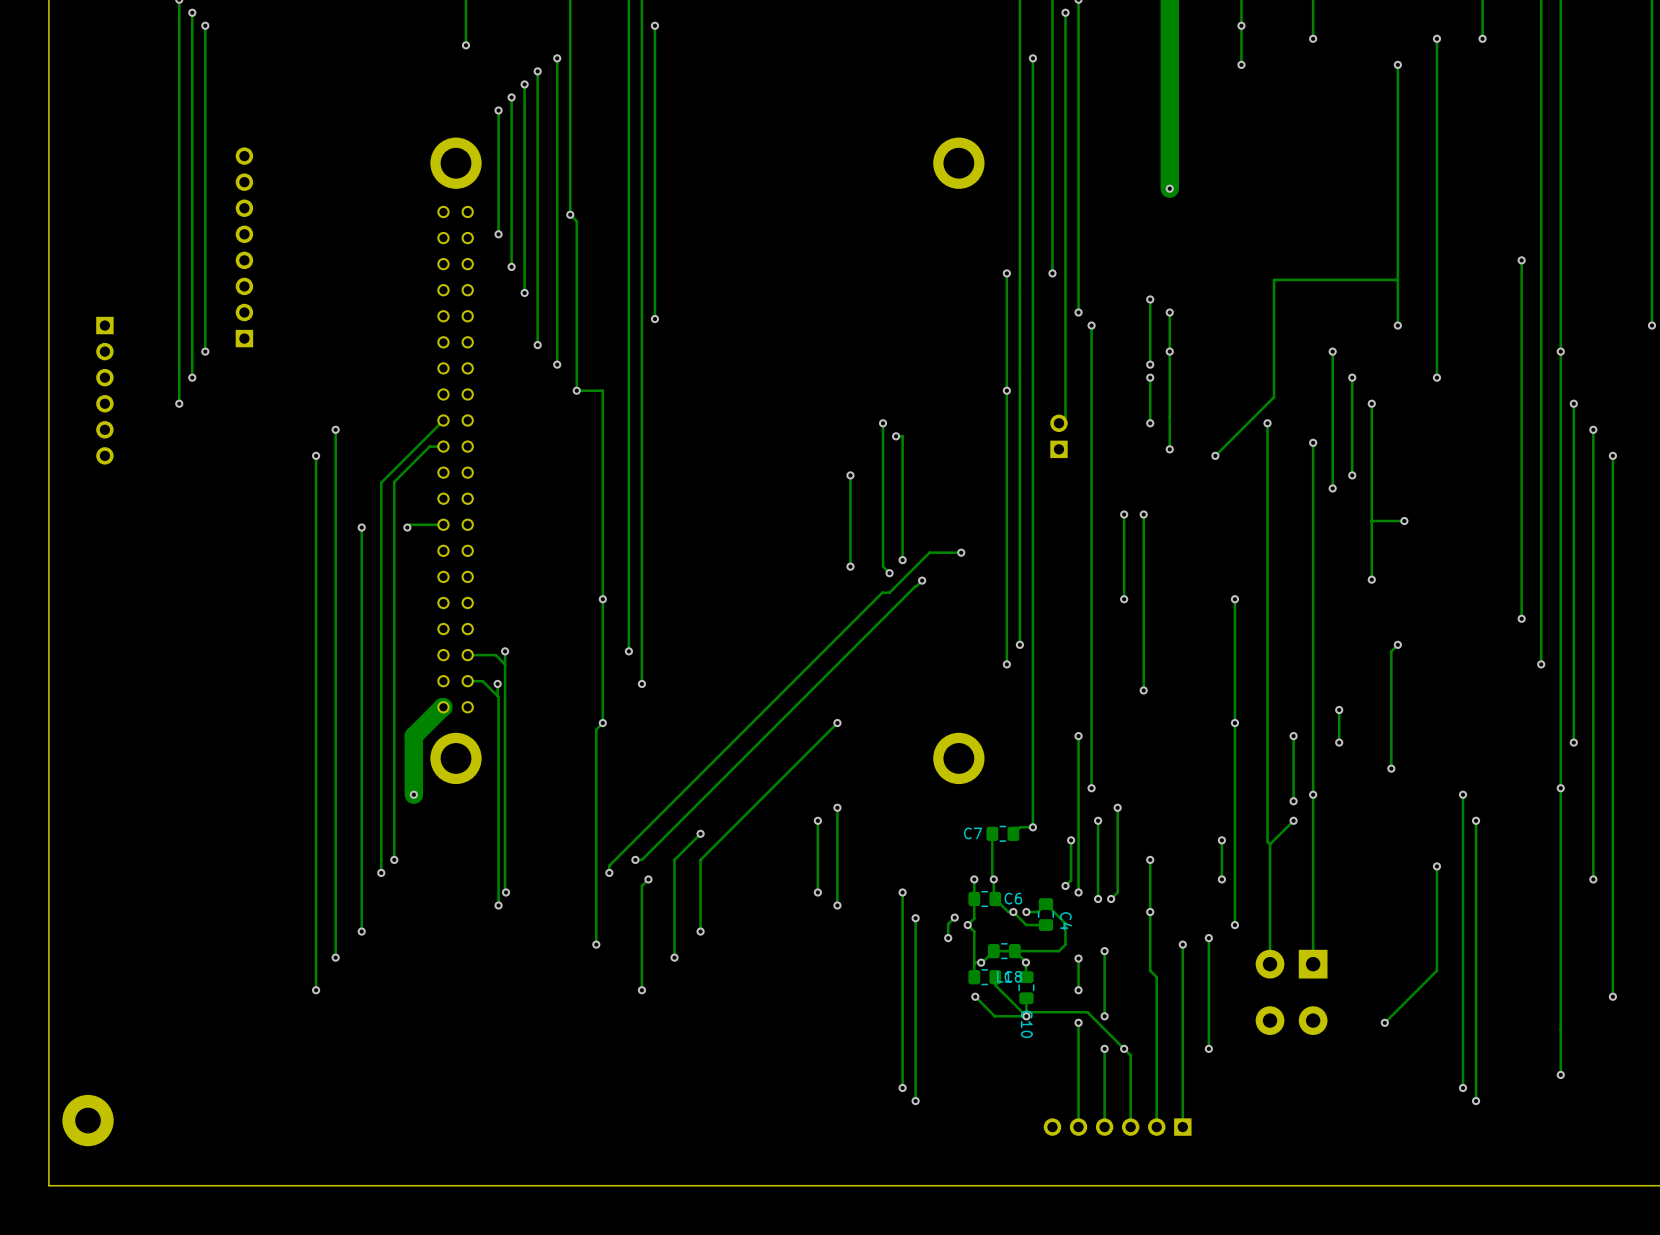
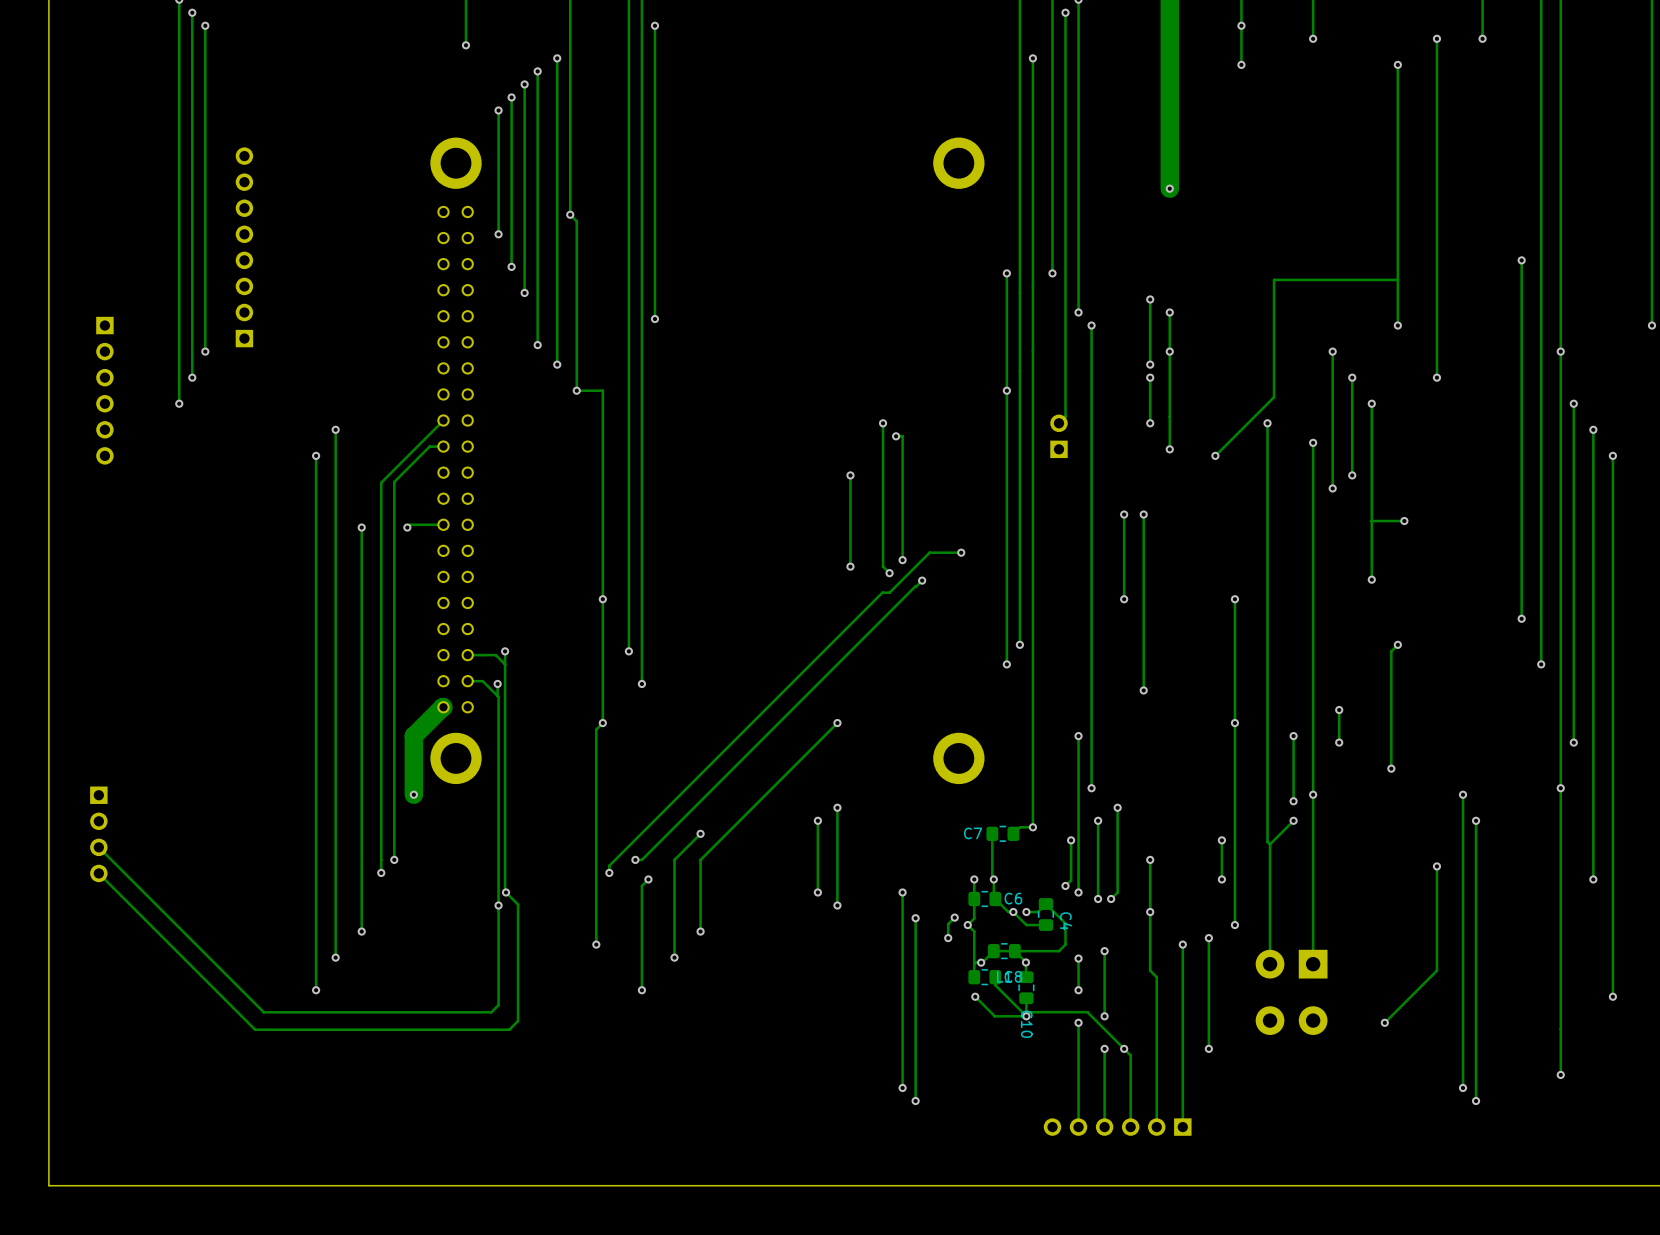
part: none -> (98, 834)
track: none -> (98, 847) (263, 1012) (491, 1012) (498, 1005) (498, 905)
track: none -> (98, 873) (255, 1029) (509, 1029) (518, 1021) (518, 904) (506, 892)
part: (88, 1120) -> none

